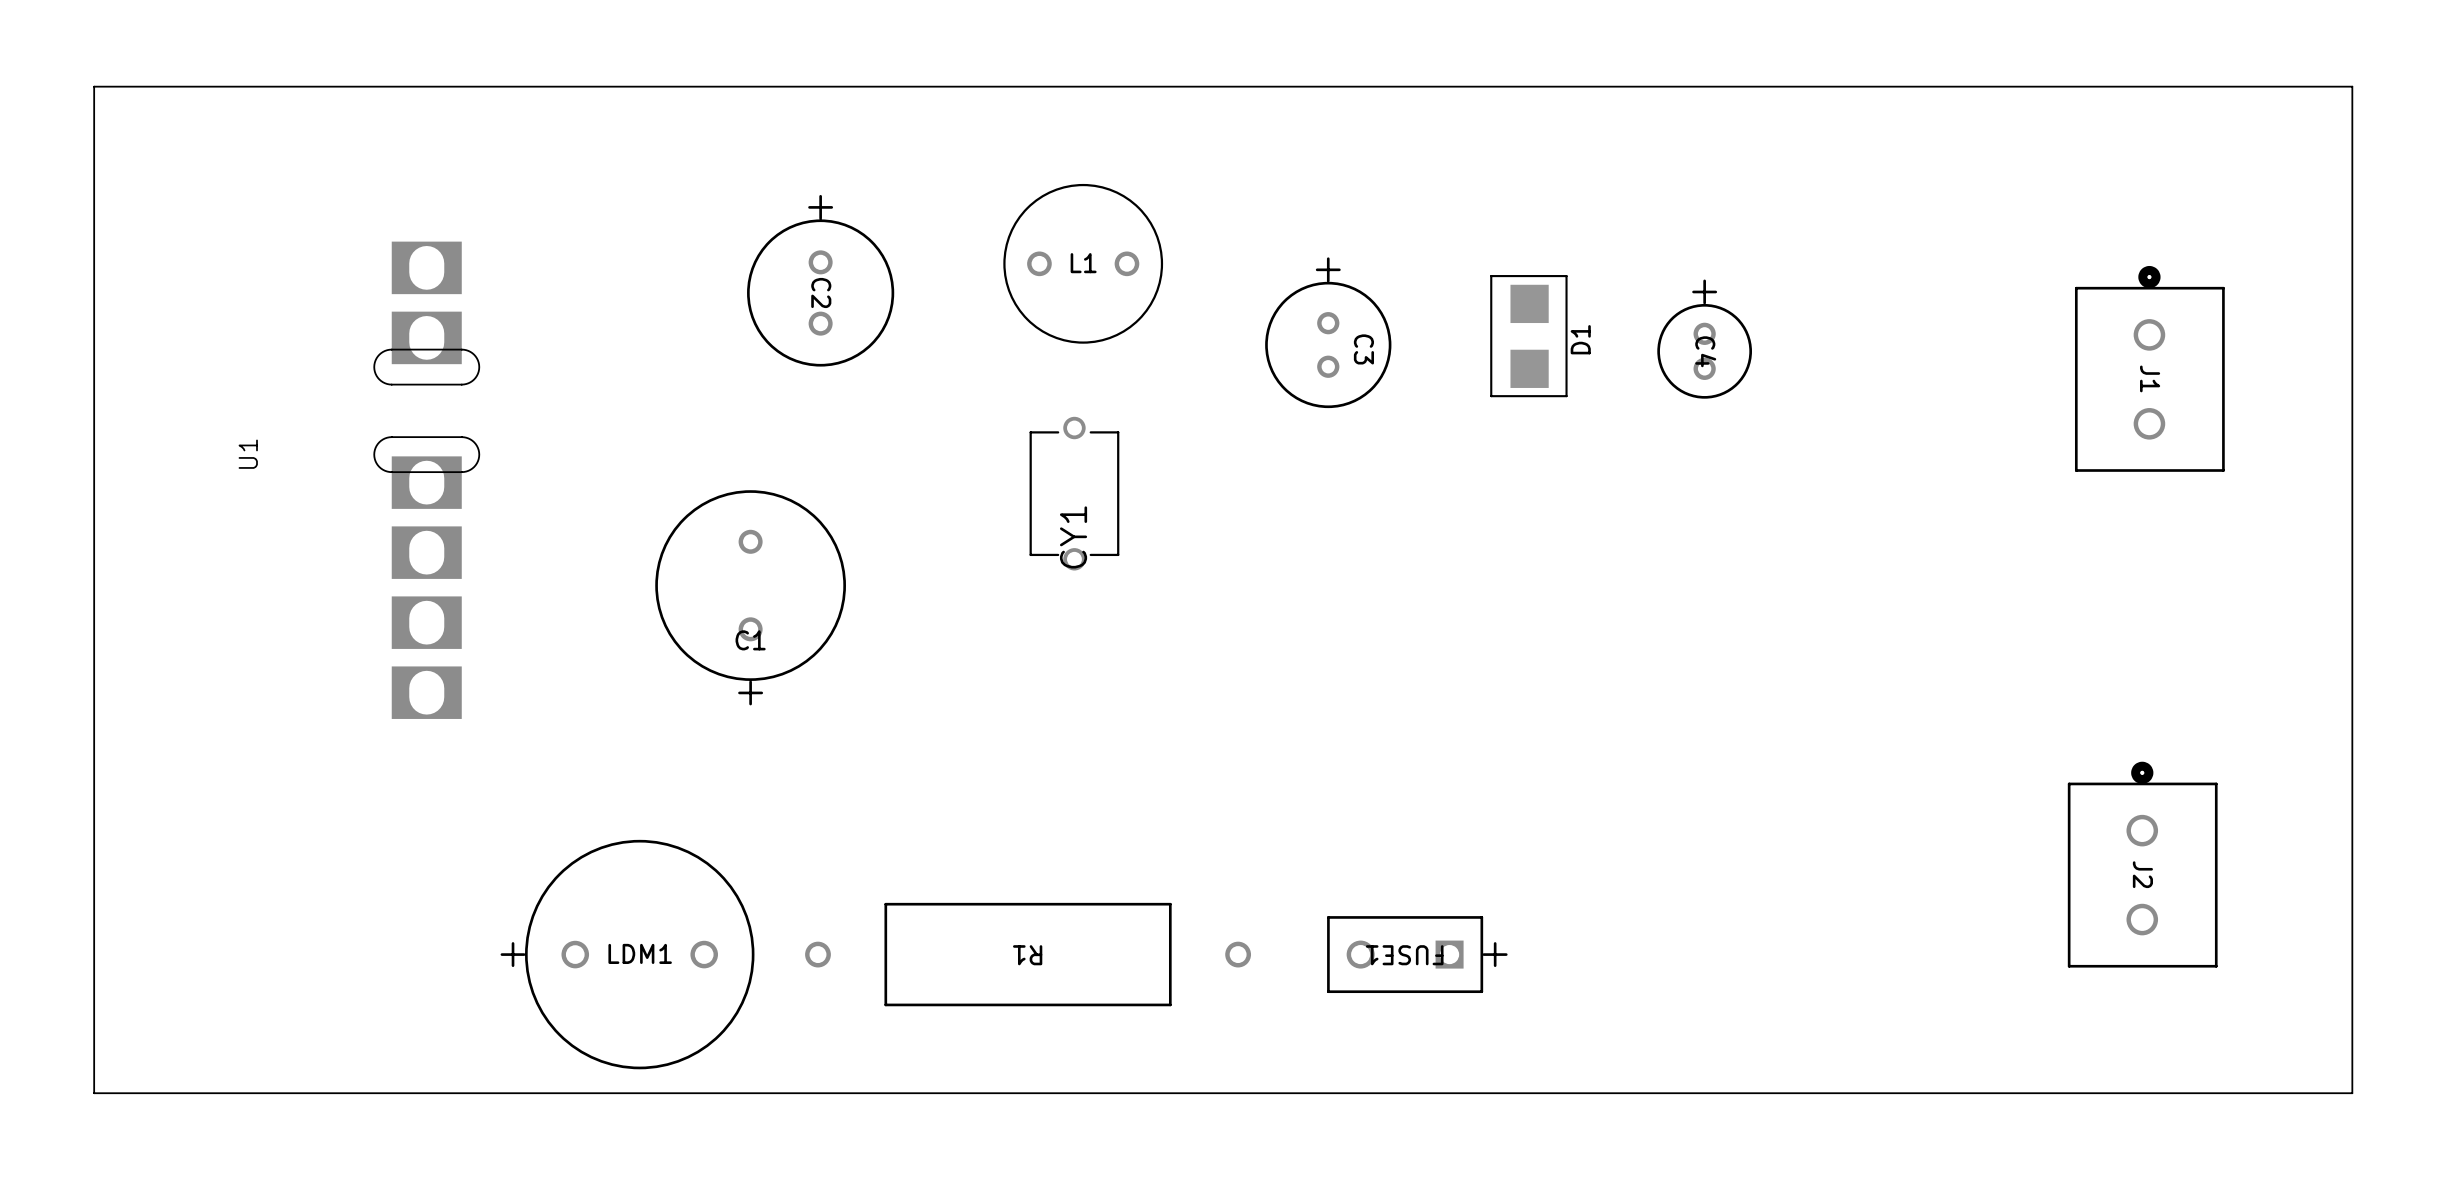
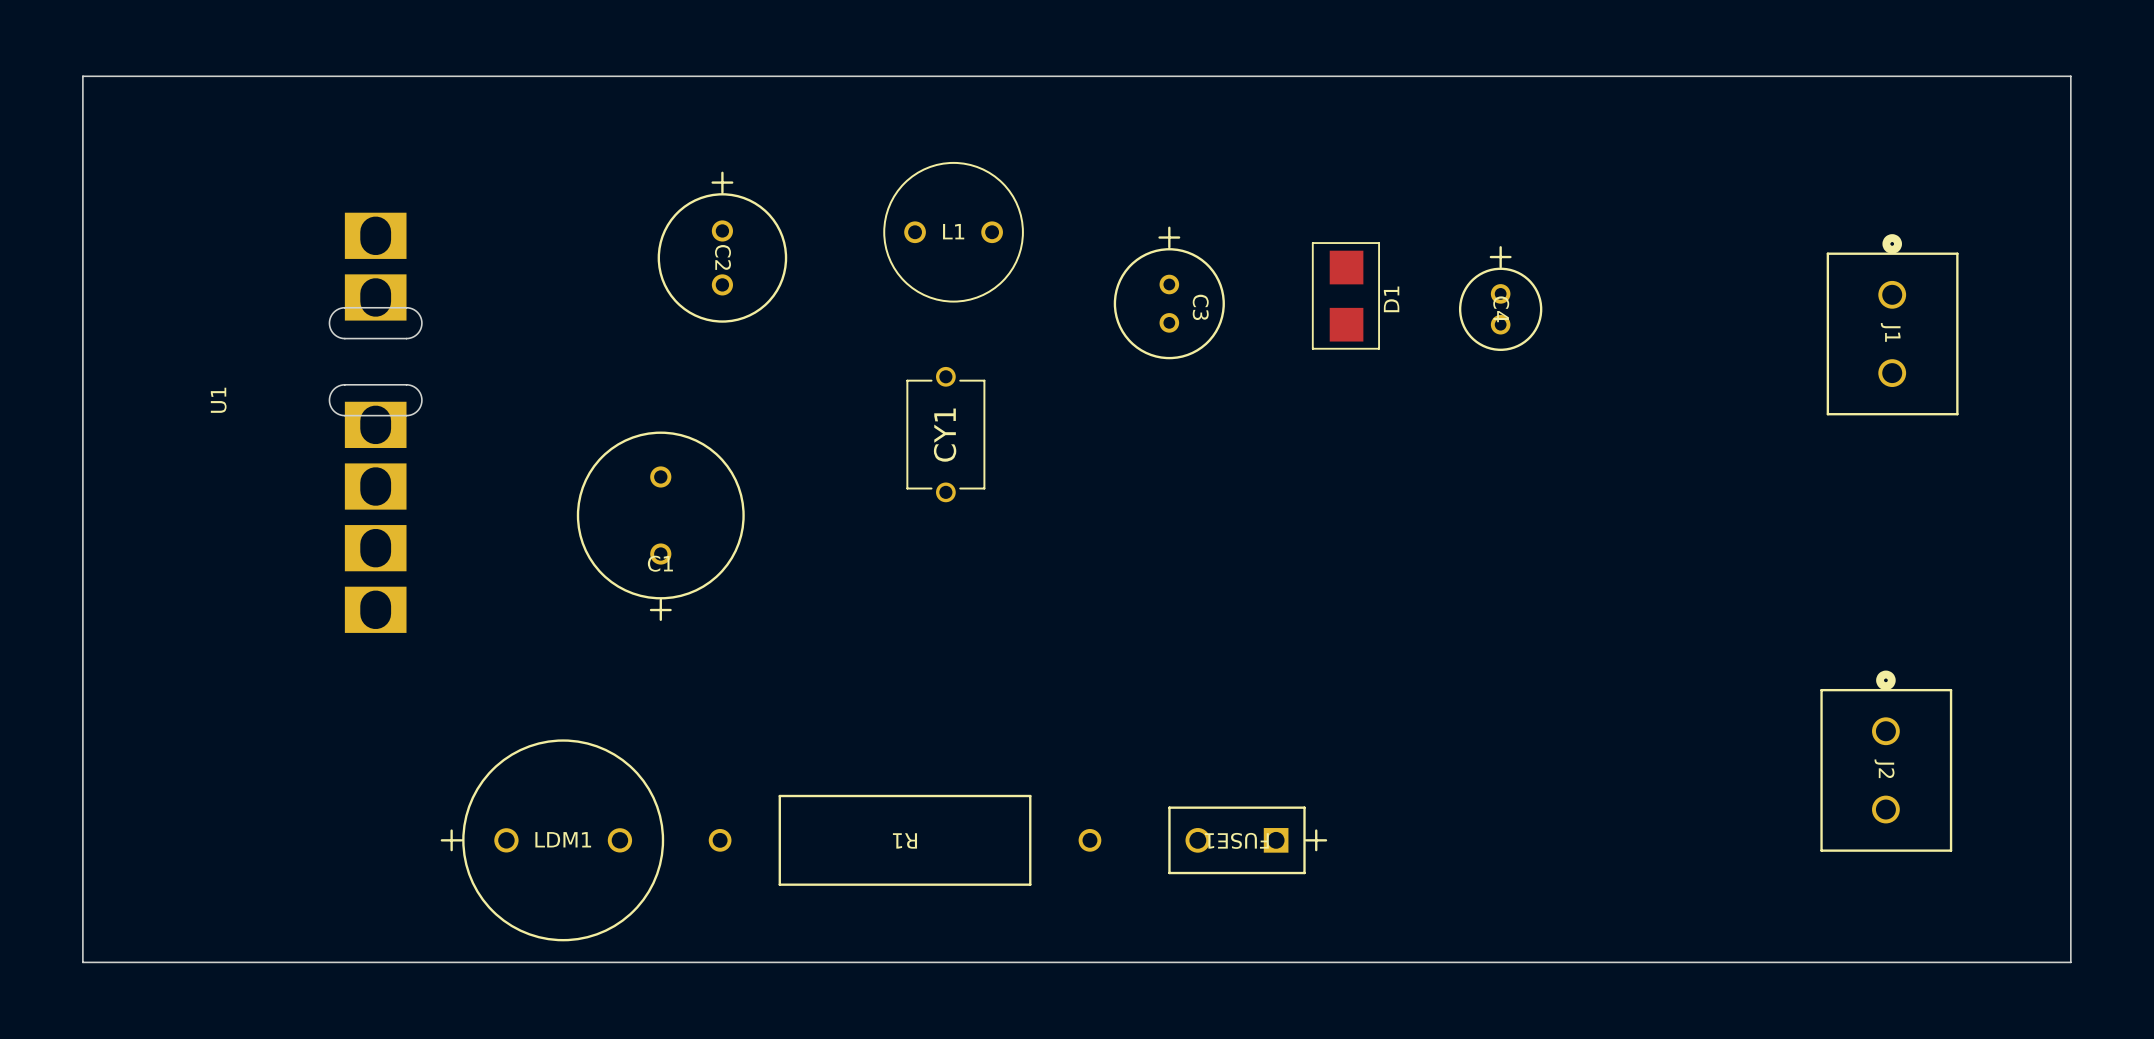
CY1 name position: CY1 (1073, 537) -> CY1 (945, 435)

